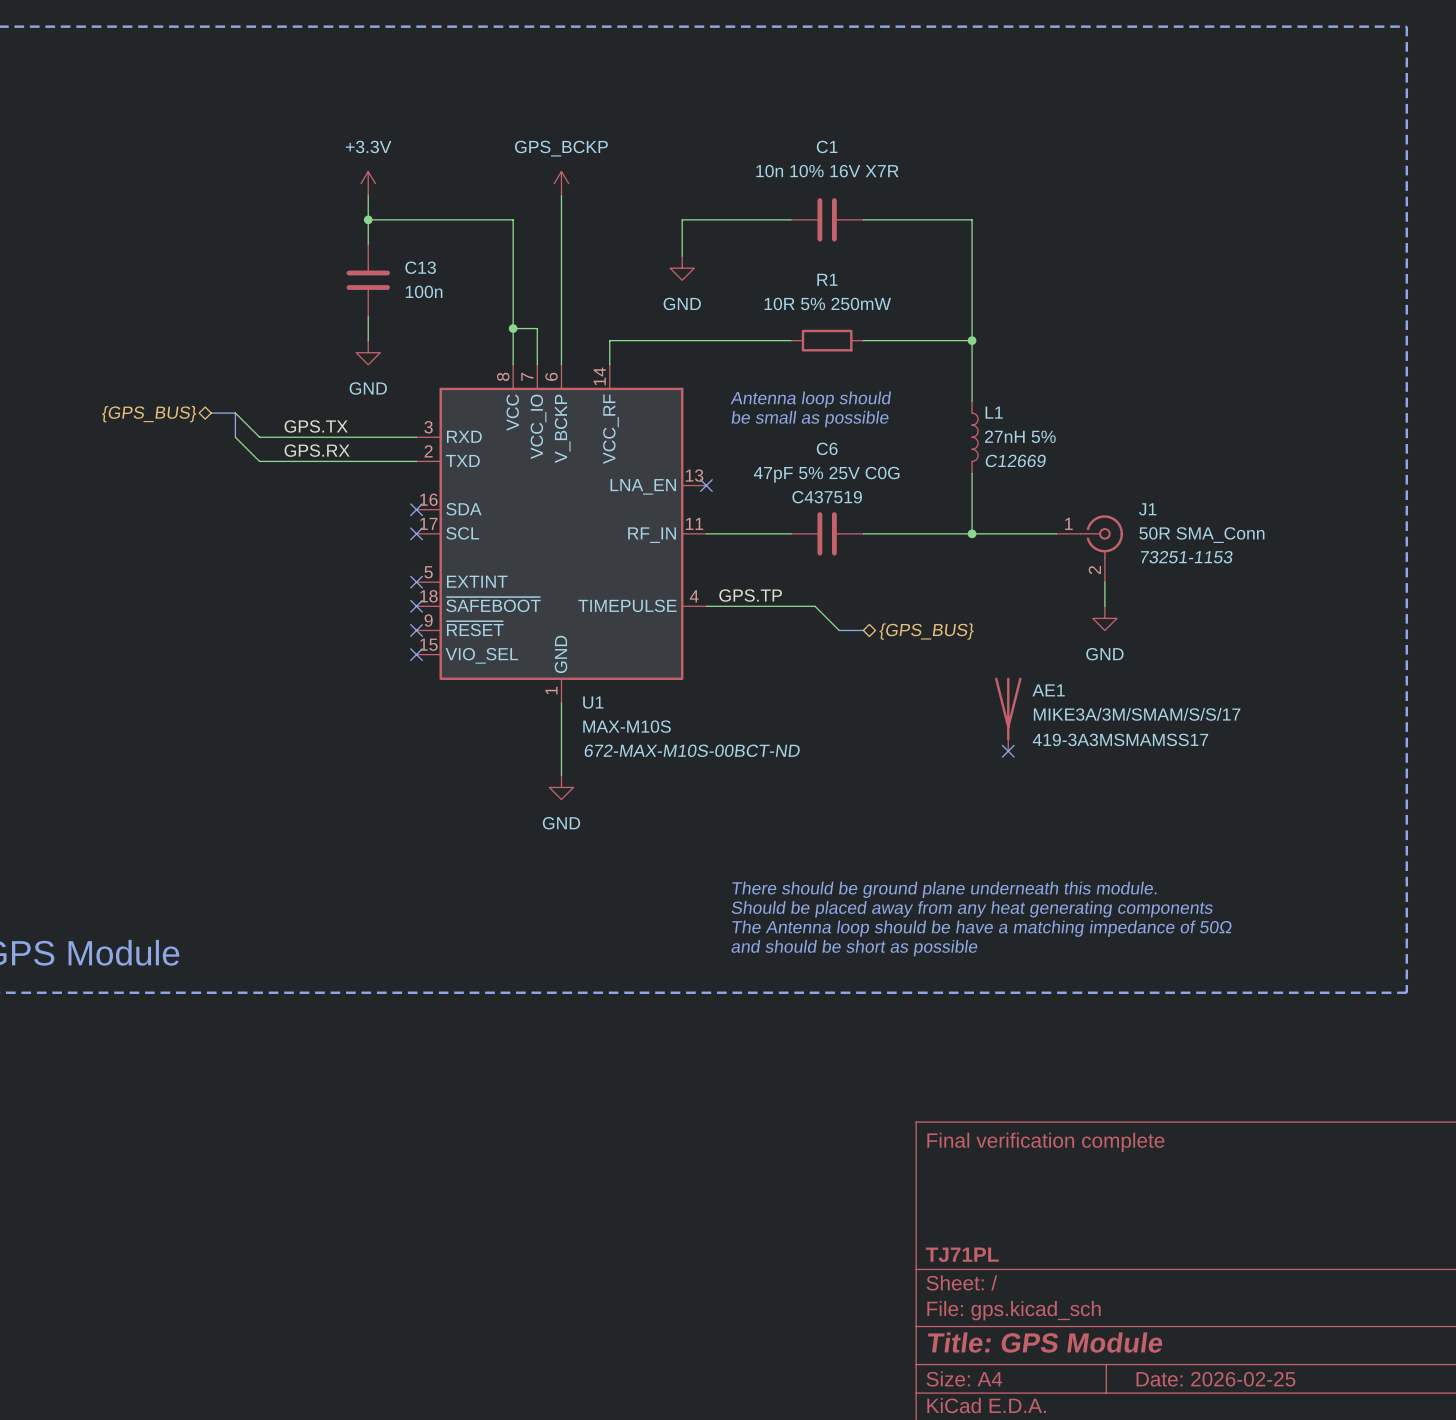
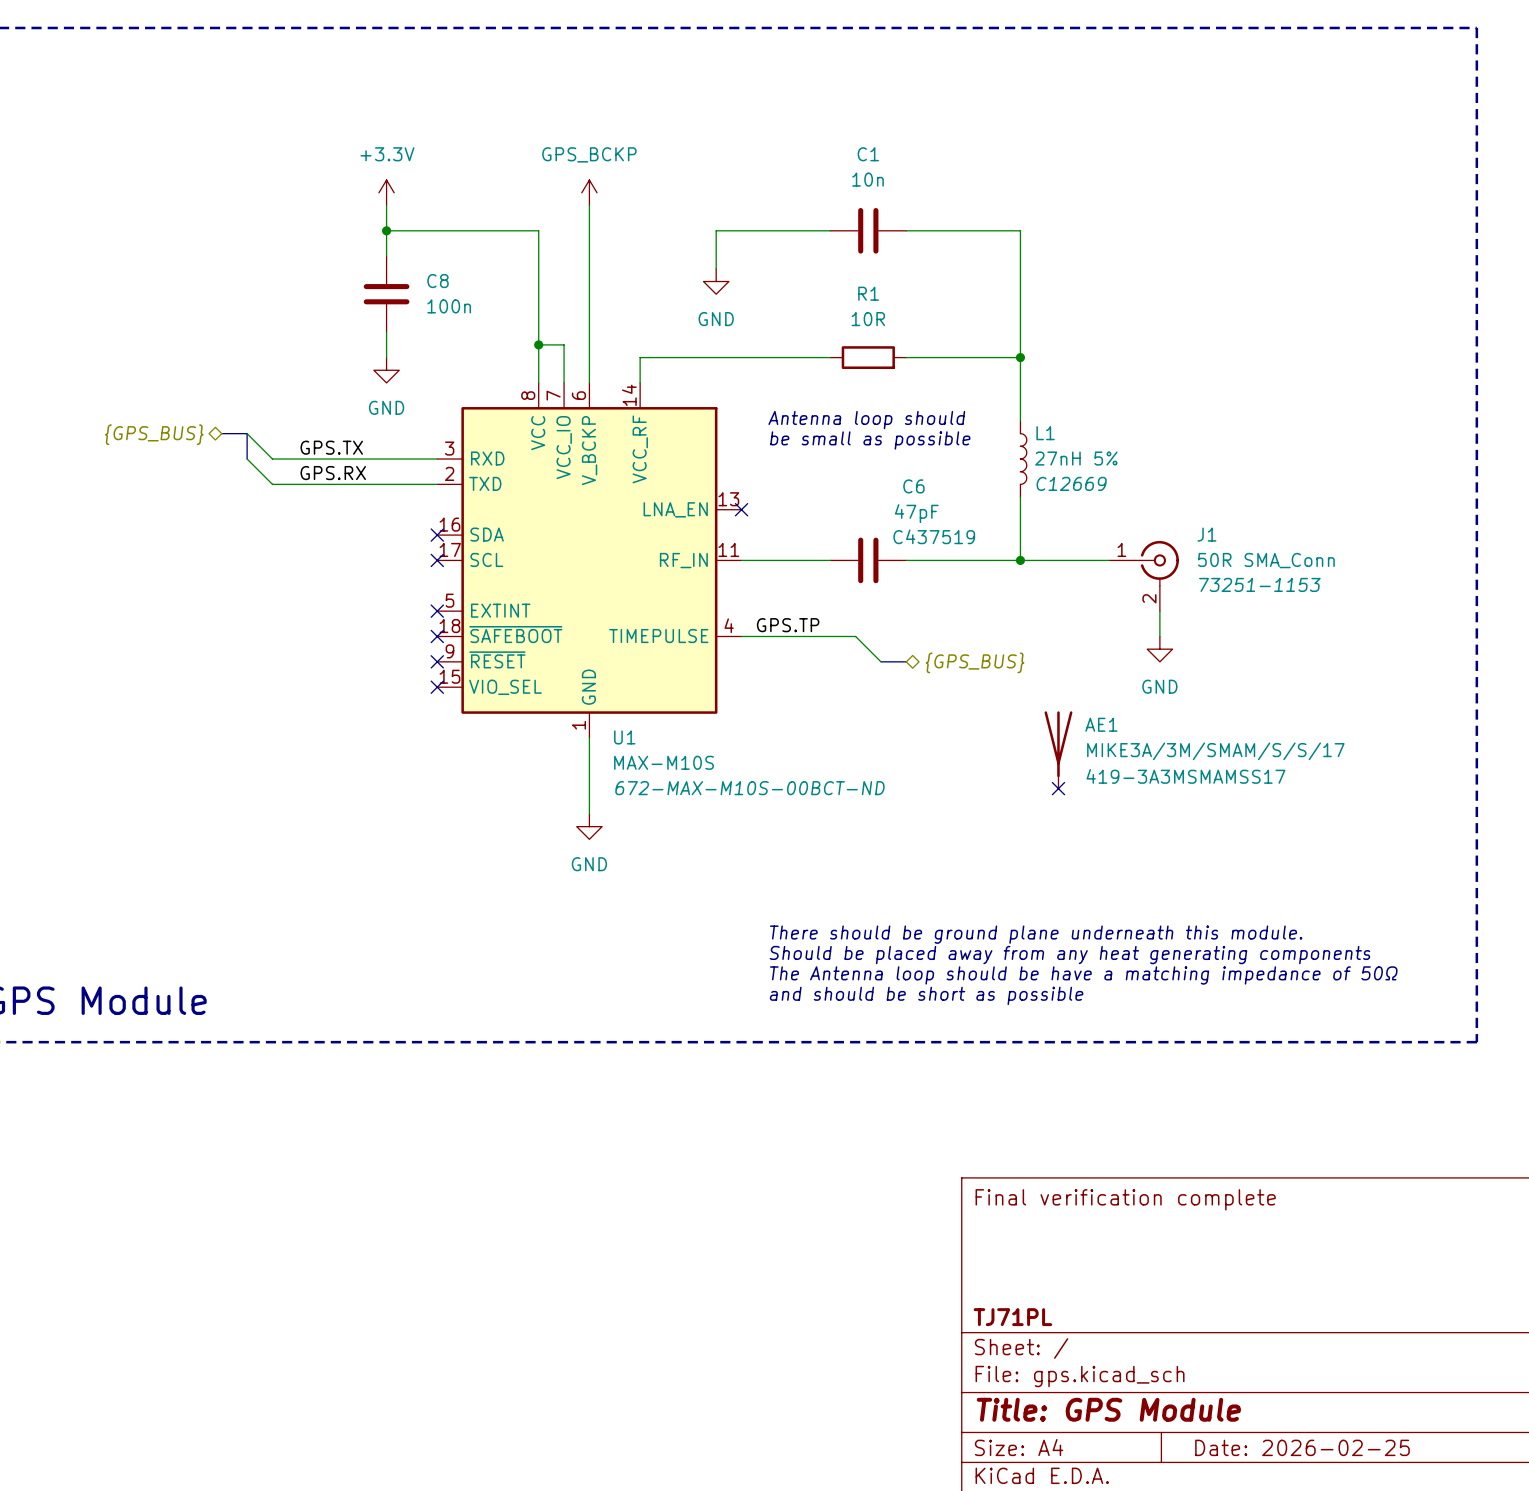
C1 value: 10n 10% 16V X7R (827, 171) -> 10n (868, 179)
C13 name: C13 (420, 267) -> C8 (437, 281)
R1 value: 10R 5% 250mW (827, 303) -> 10R (868, 319)
C6 name position: C6 (827, 448) -> C6 (913, 486)
C6 value: 47pF 5% 25V C0G (826, 474) -> 47pF (916, 513)
C6 text position: C437519 (827, 497) -> C437519 (934, 536)

